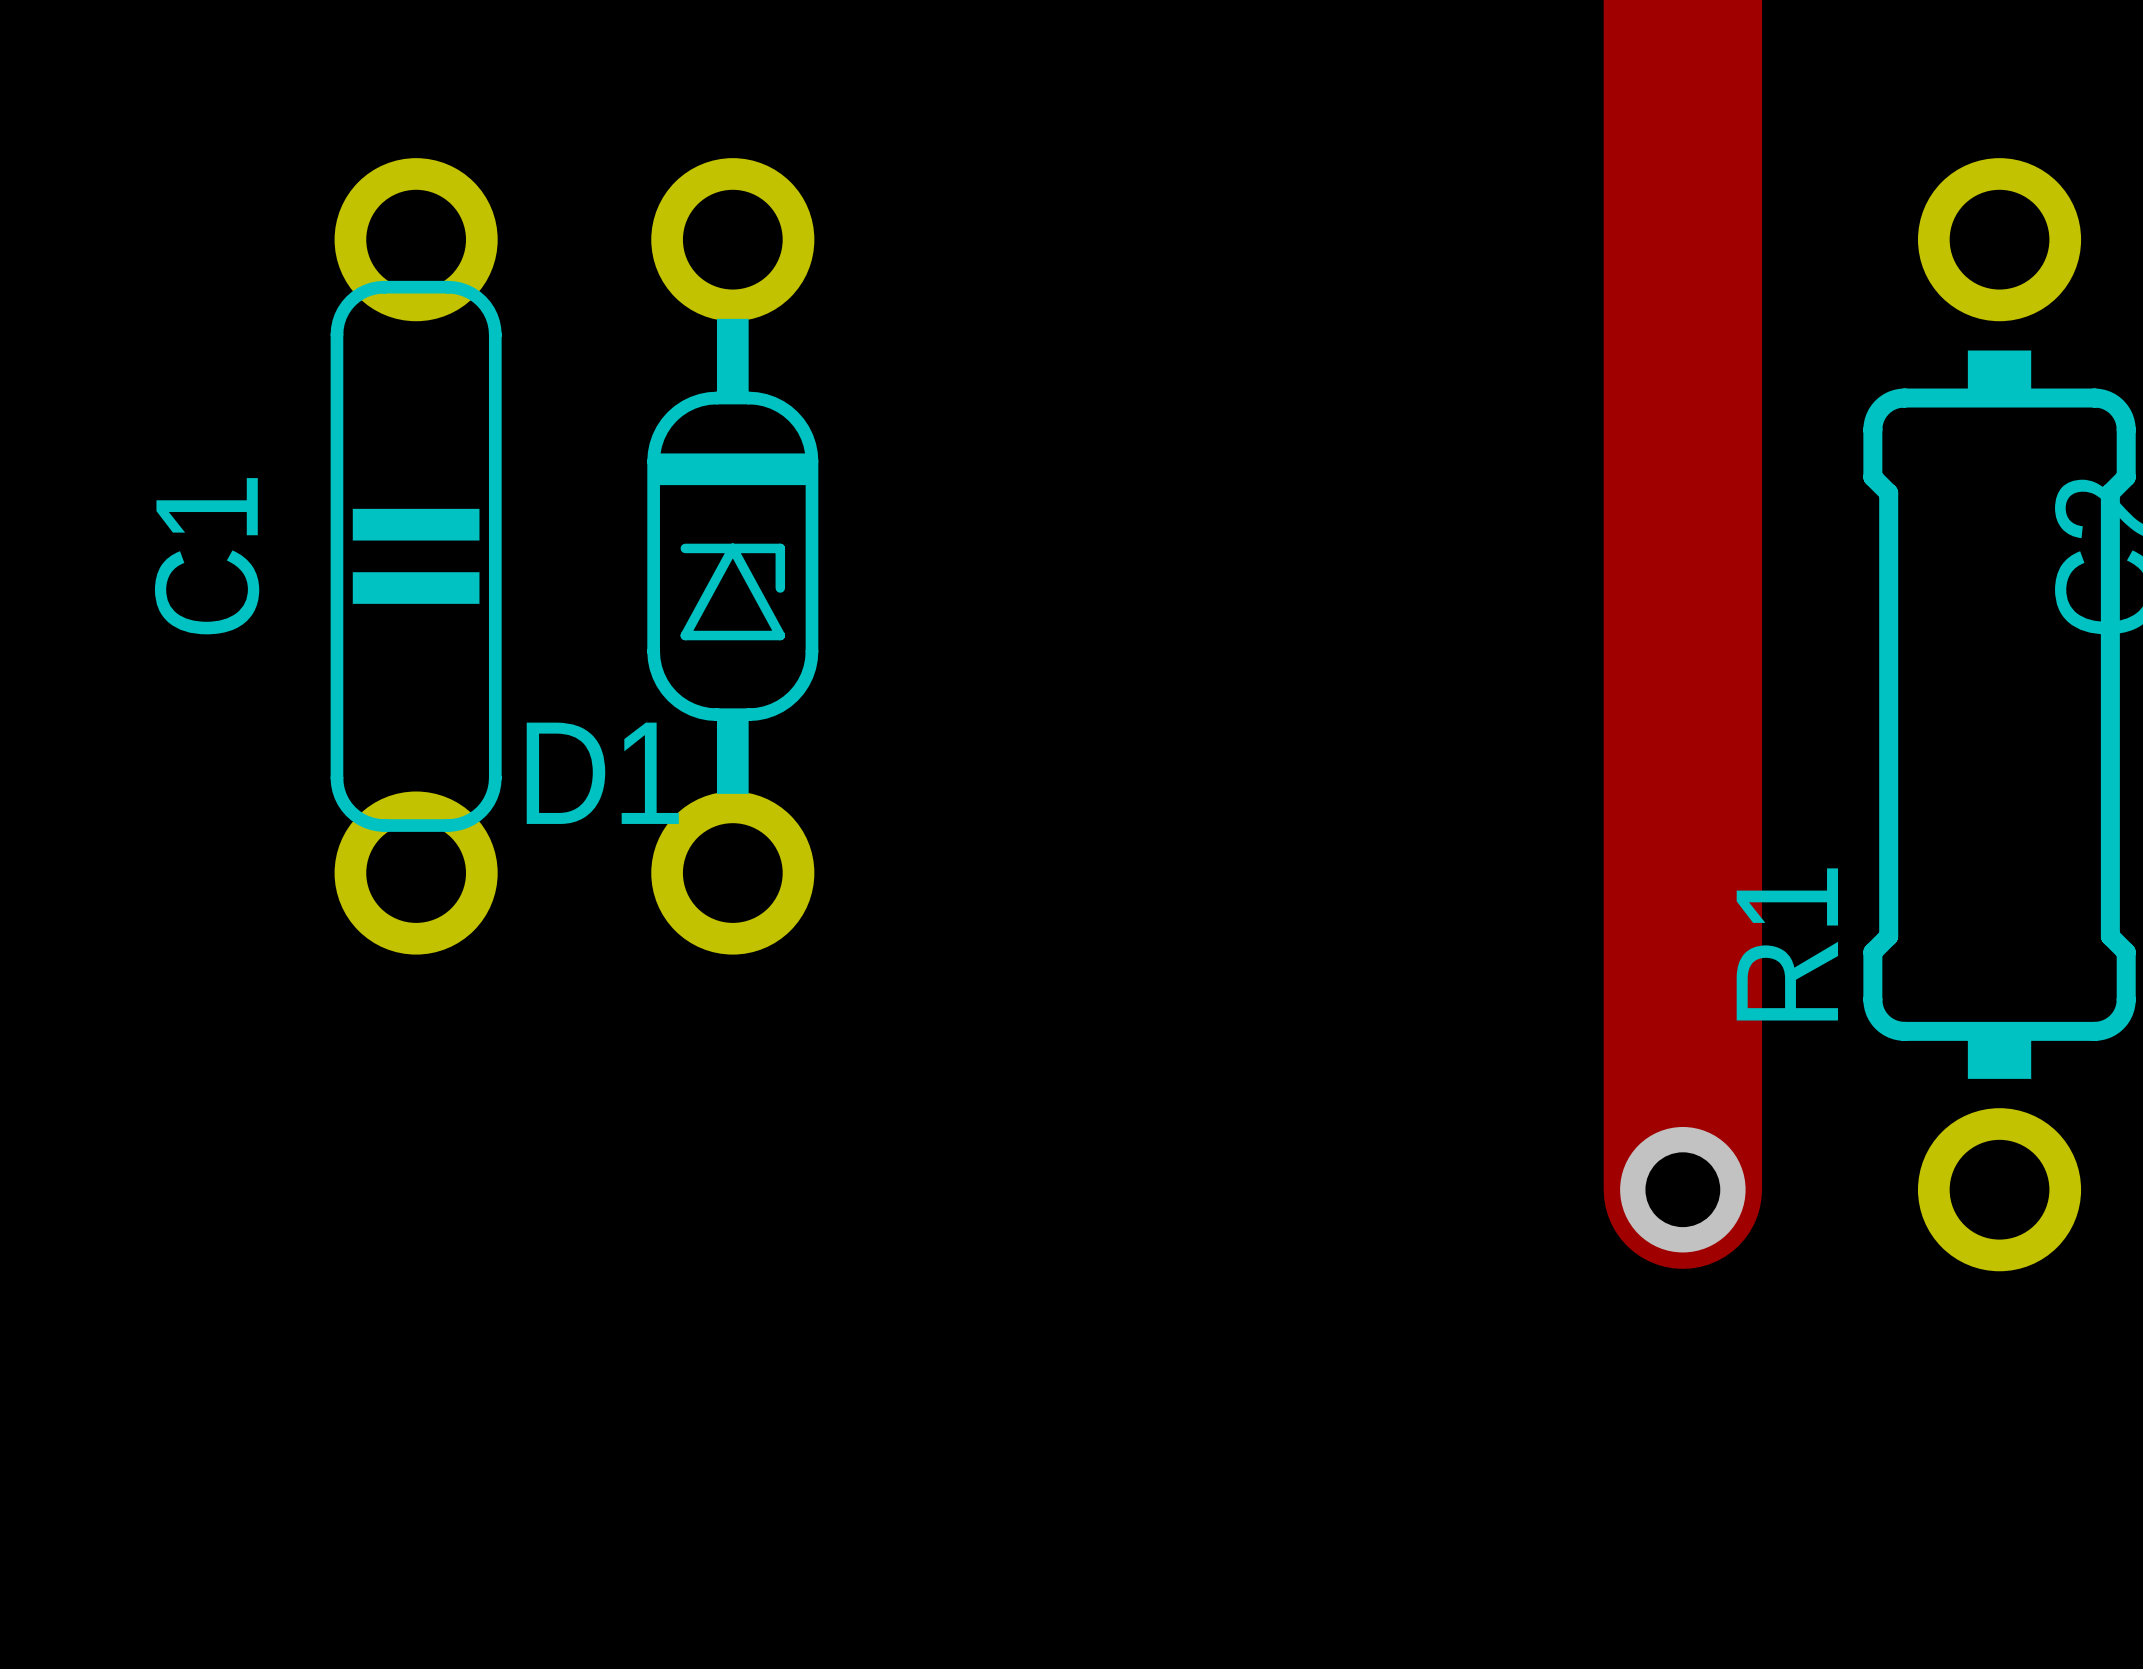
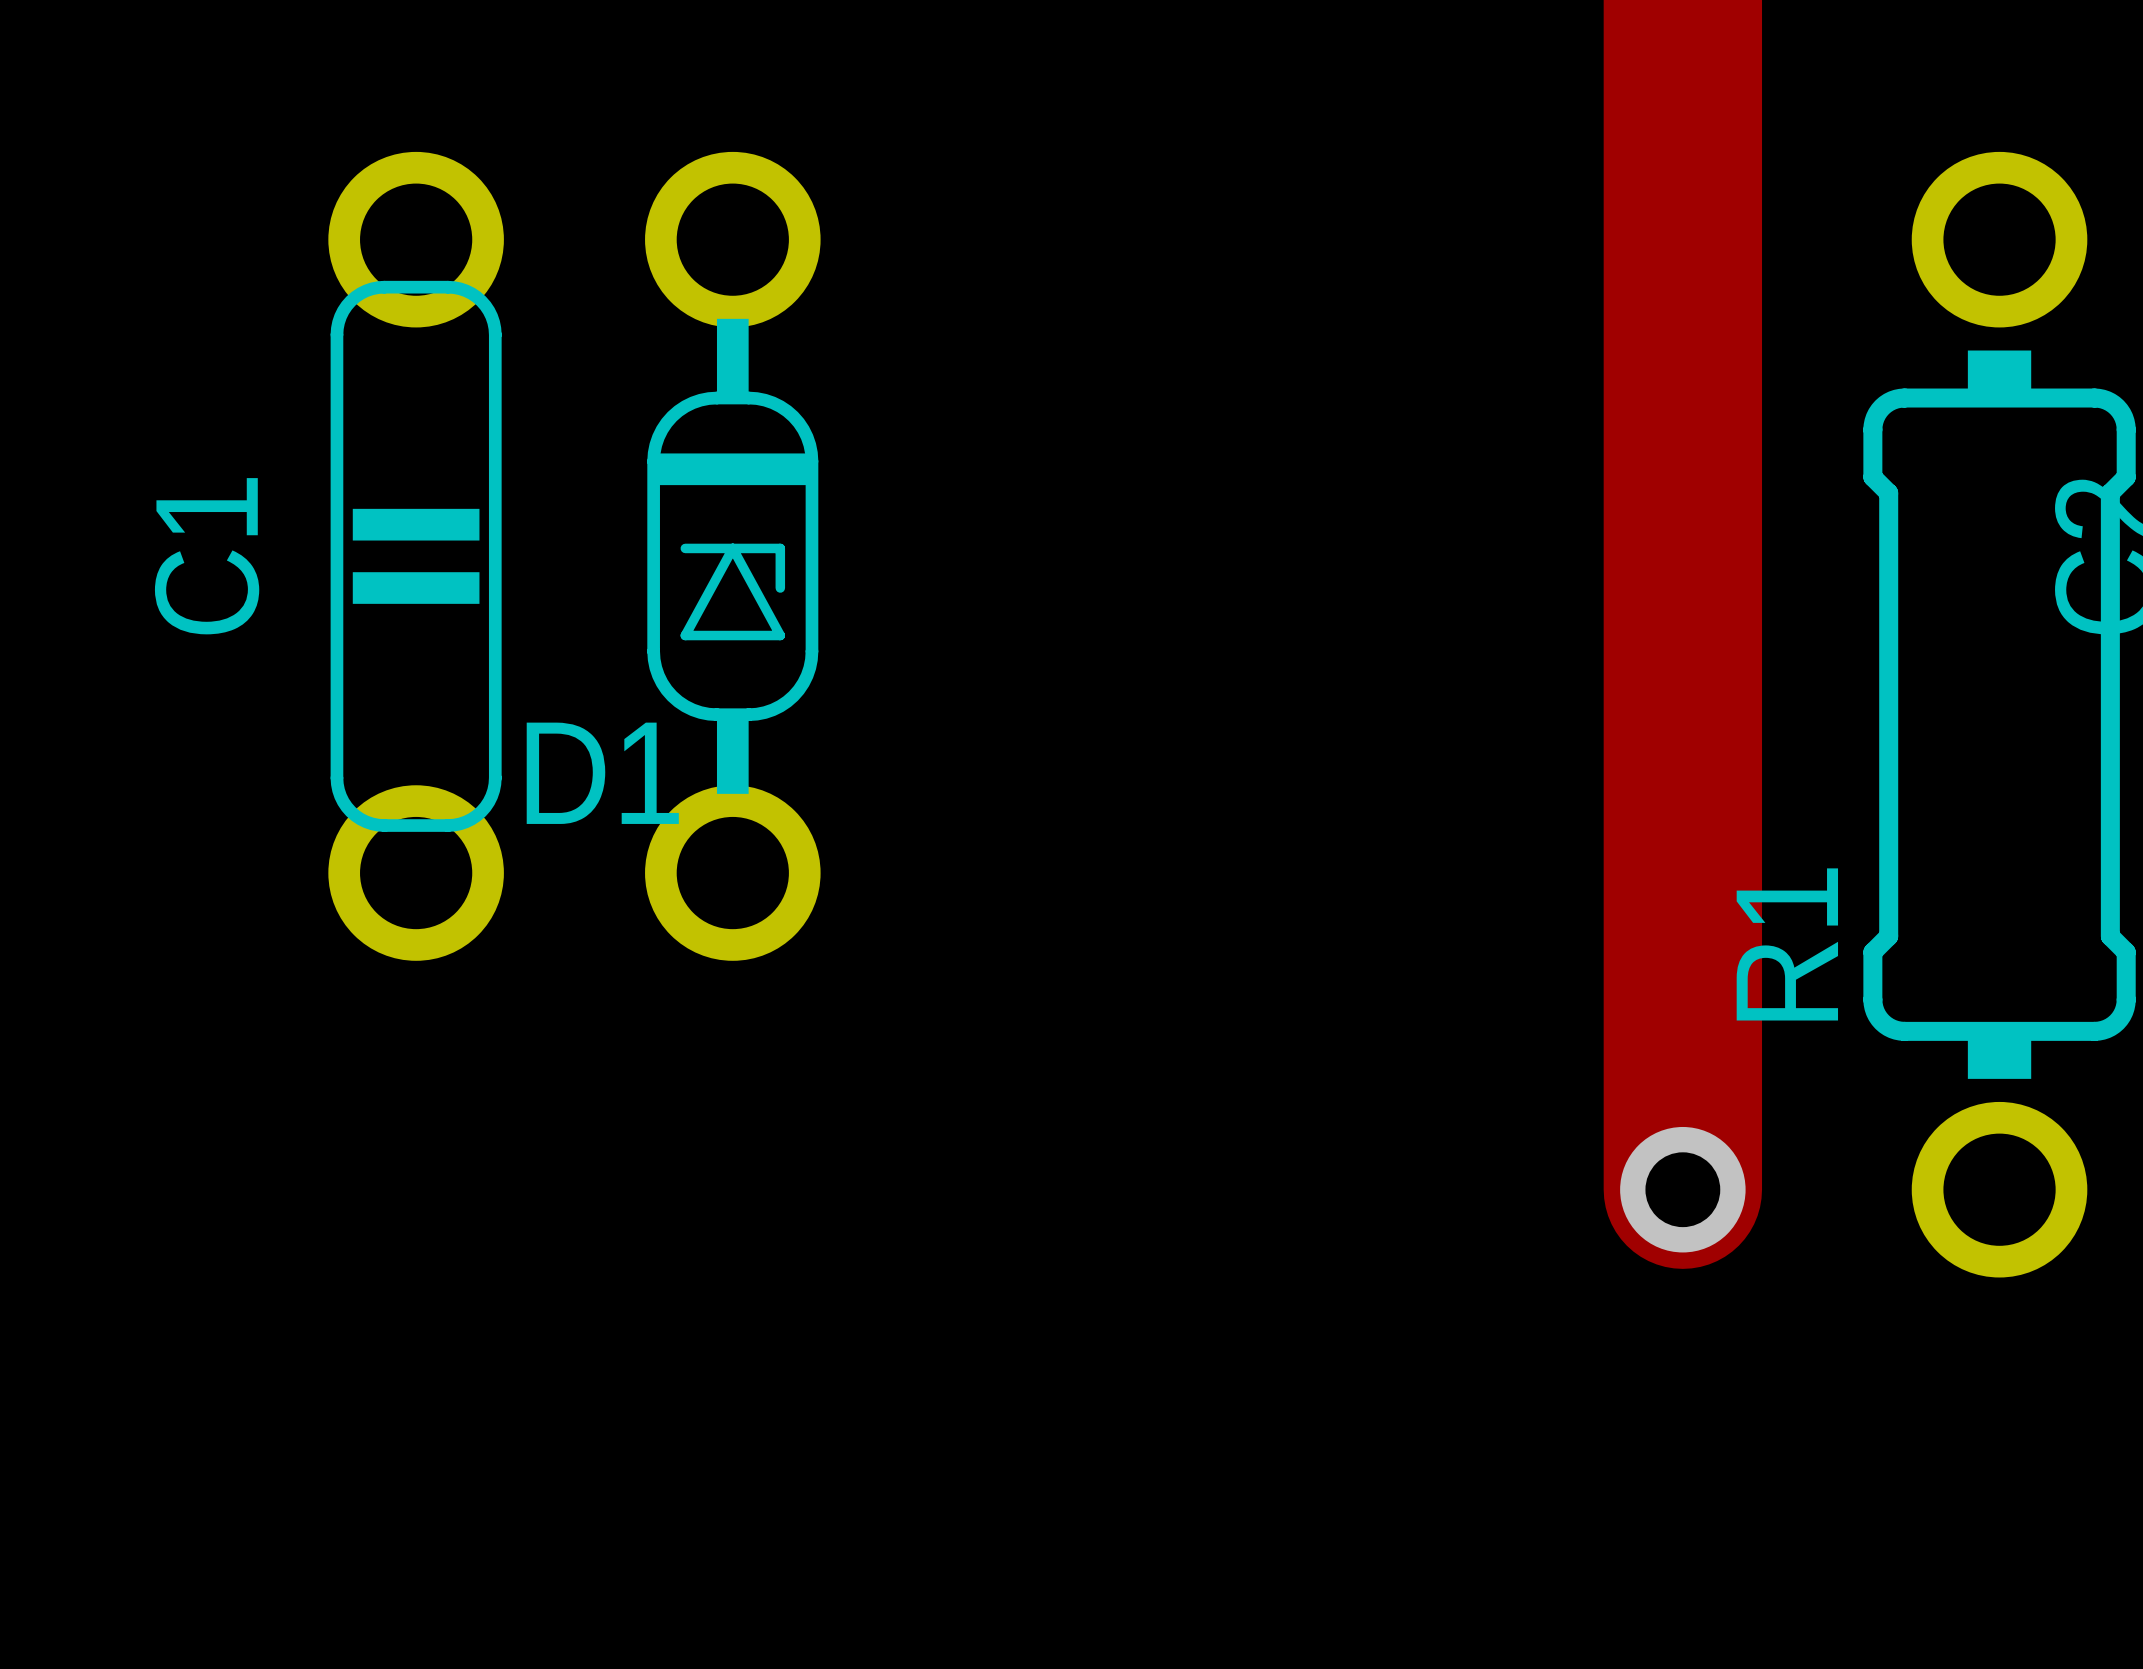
C1 footprint: [330, 158, 502, 955] -> [328, 151, 504, 961]
D1 footprint: [647, 158, 819, 955] -> [645, 151, 821, 961]
R1 footprint: [1863, 158, 2136, 1272] -> [1863, 151, 2136, 1278]

